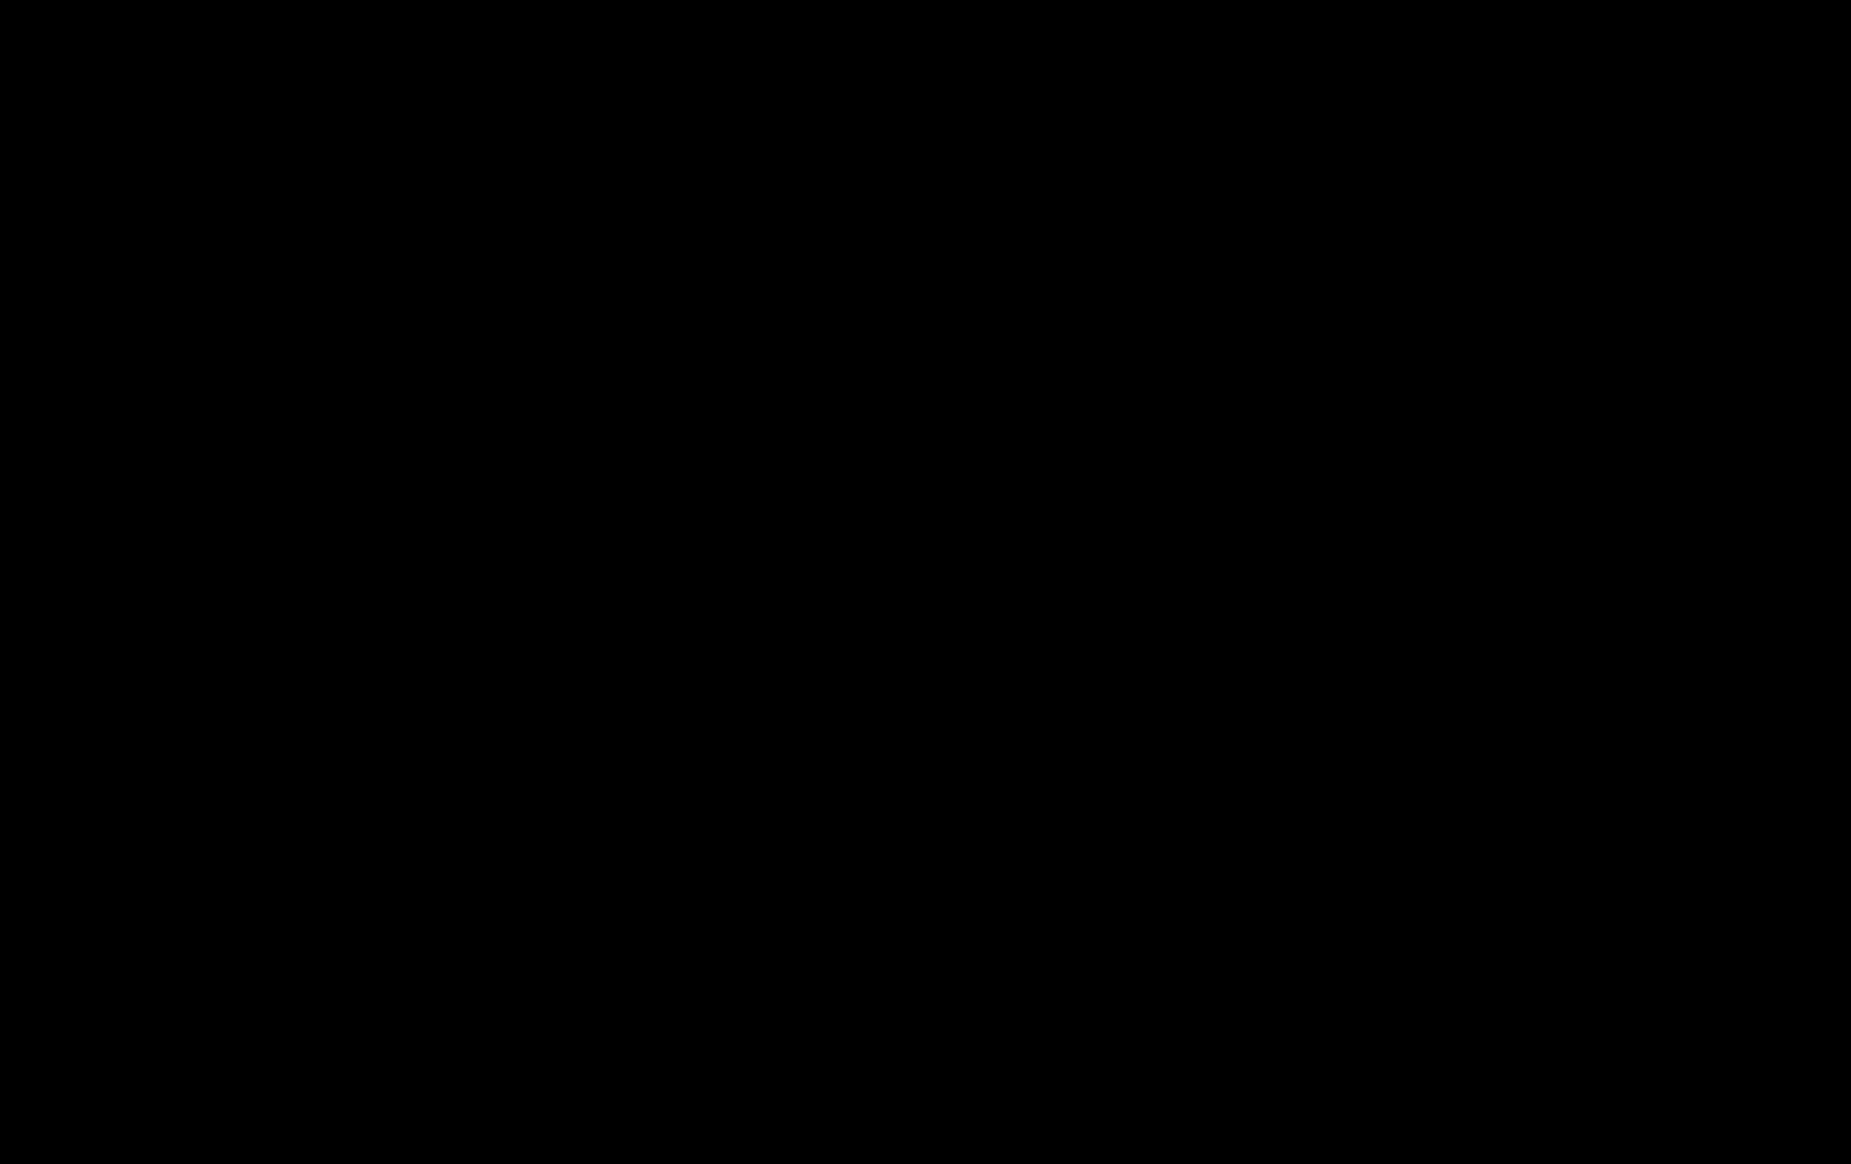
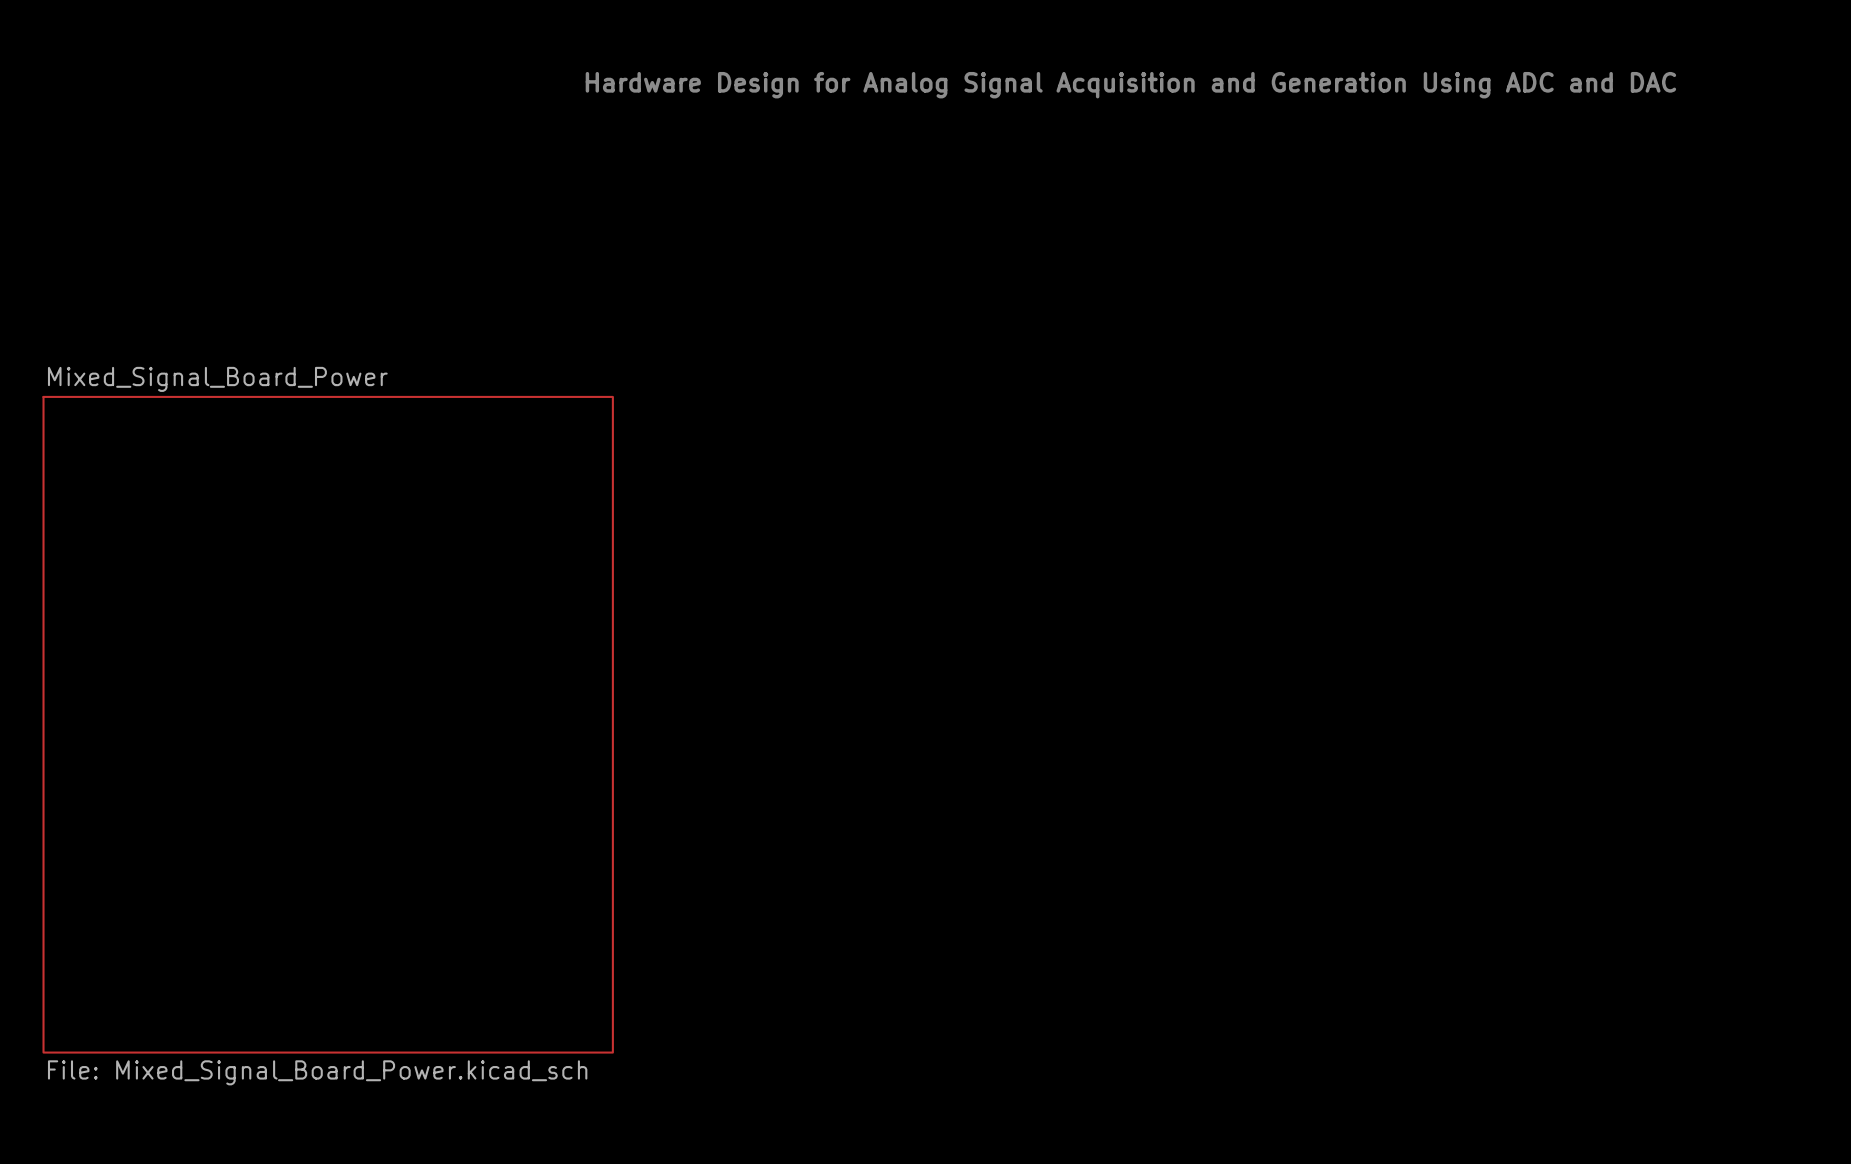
text: none -> Hardware Design for Analog Signal Acquisition and Generation Using ADC and DAC (1130, 85)
sheet Mixed_Signal_Board_Power: none -> File: Mixed_Signal_Board_Power.kicad_sch (328, 724)

